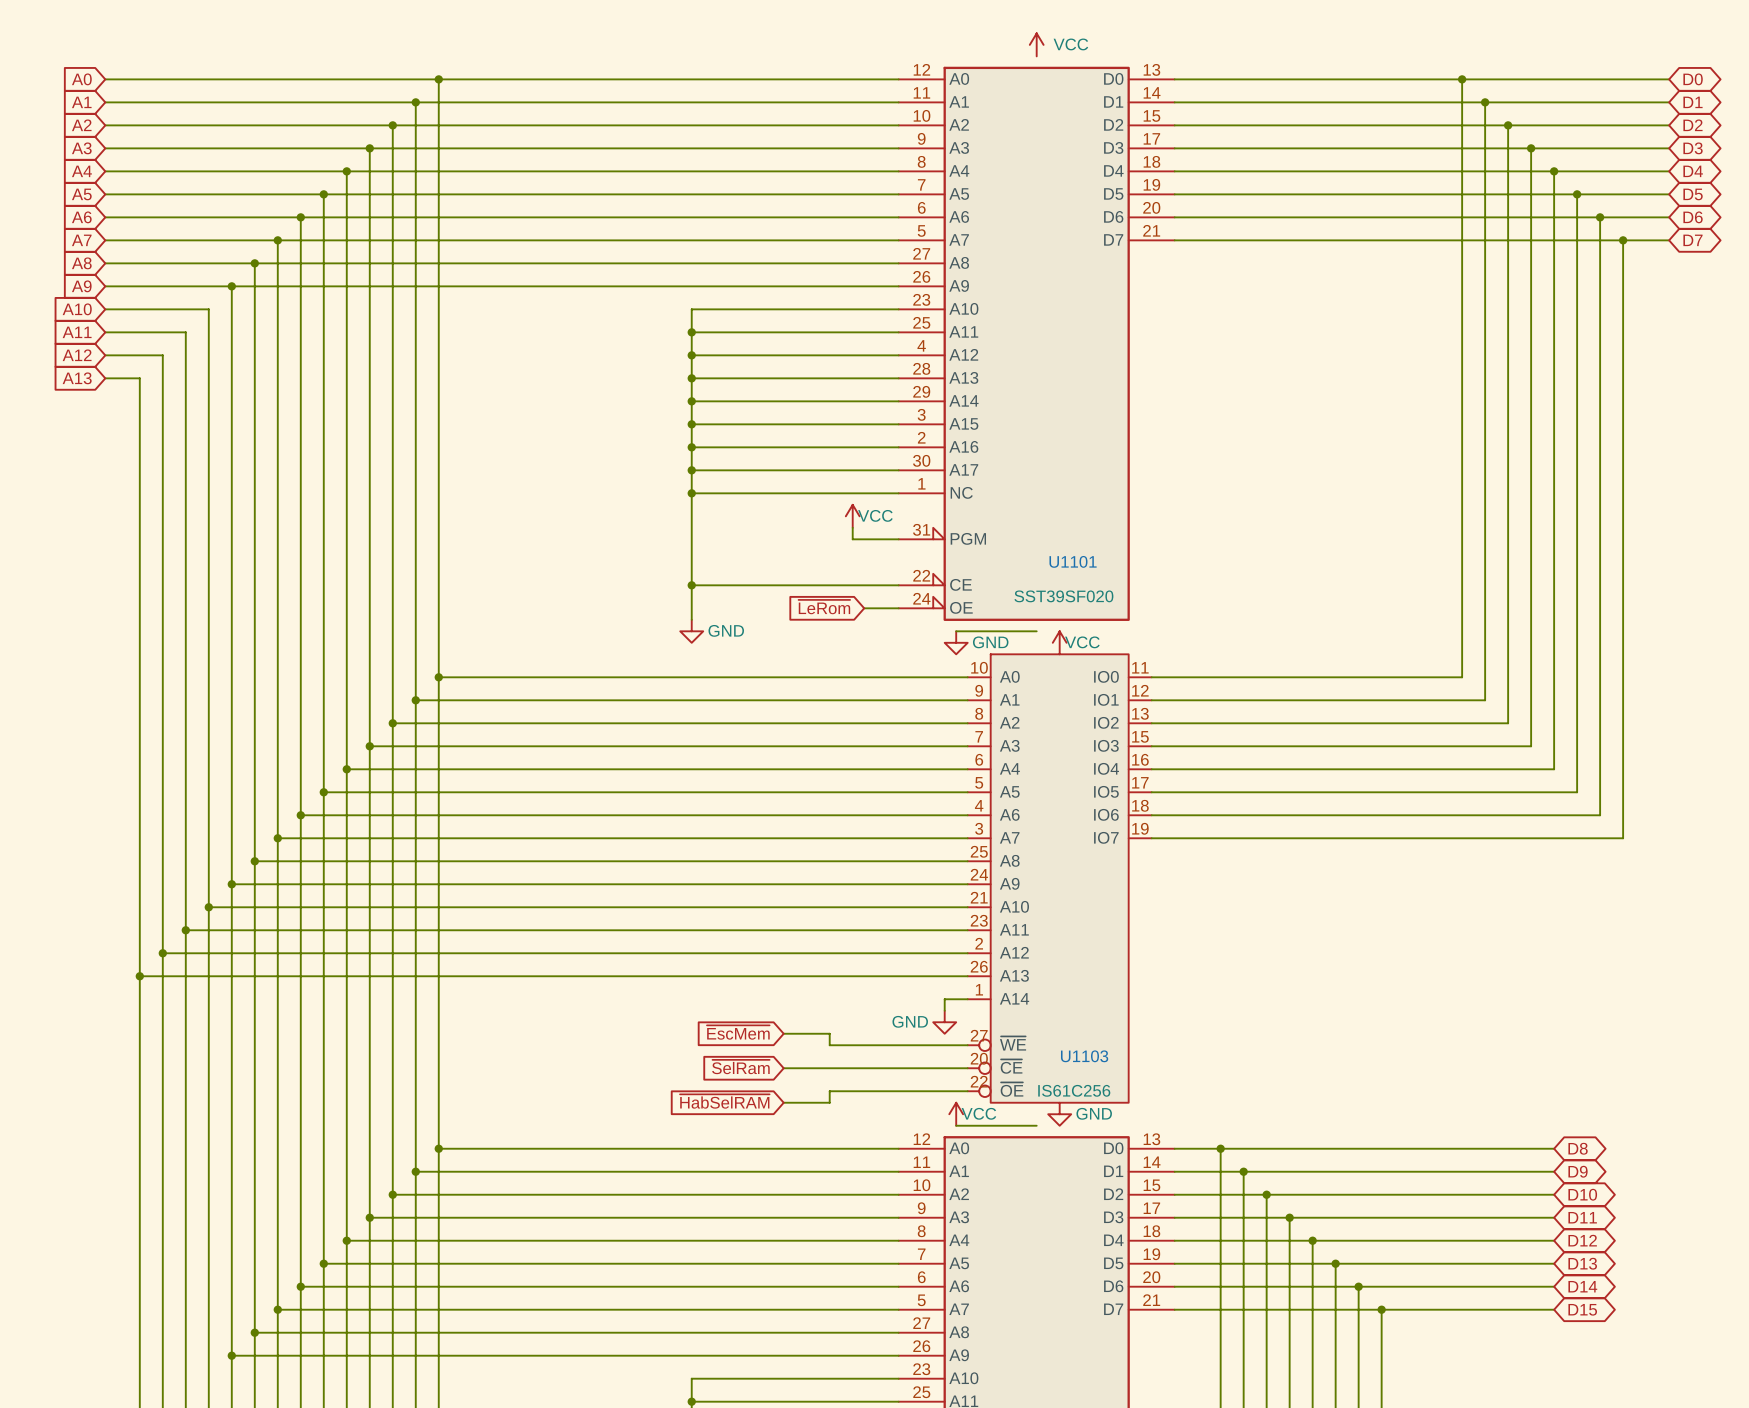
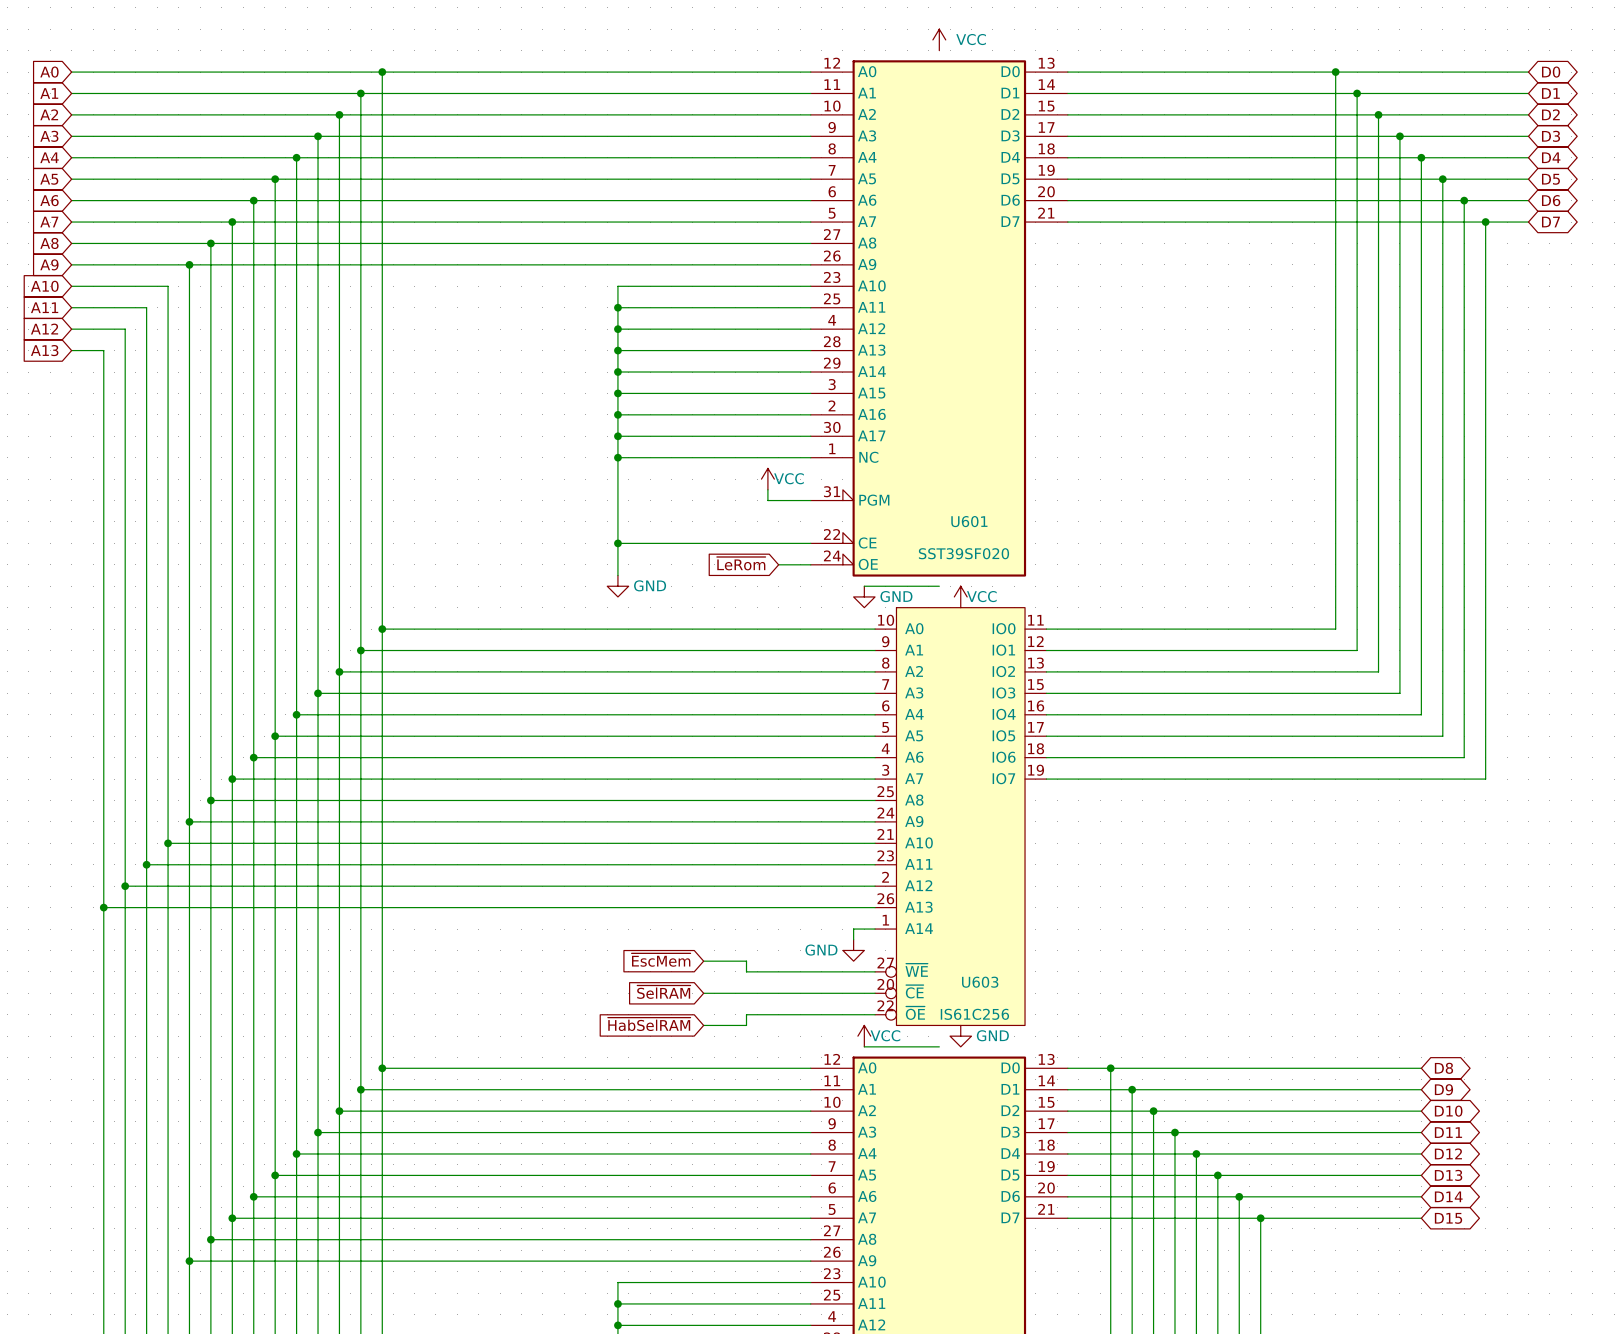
U1101 name: U1101 (1073, 561) -> U601 (969, 521)
U1103 name: U1103 (1084, 1056) -> U603 (980, 982)
global label: ~{SelRam} (740, 1067) -> ~{SelRAM} (663, 992)

